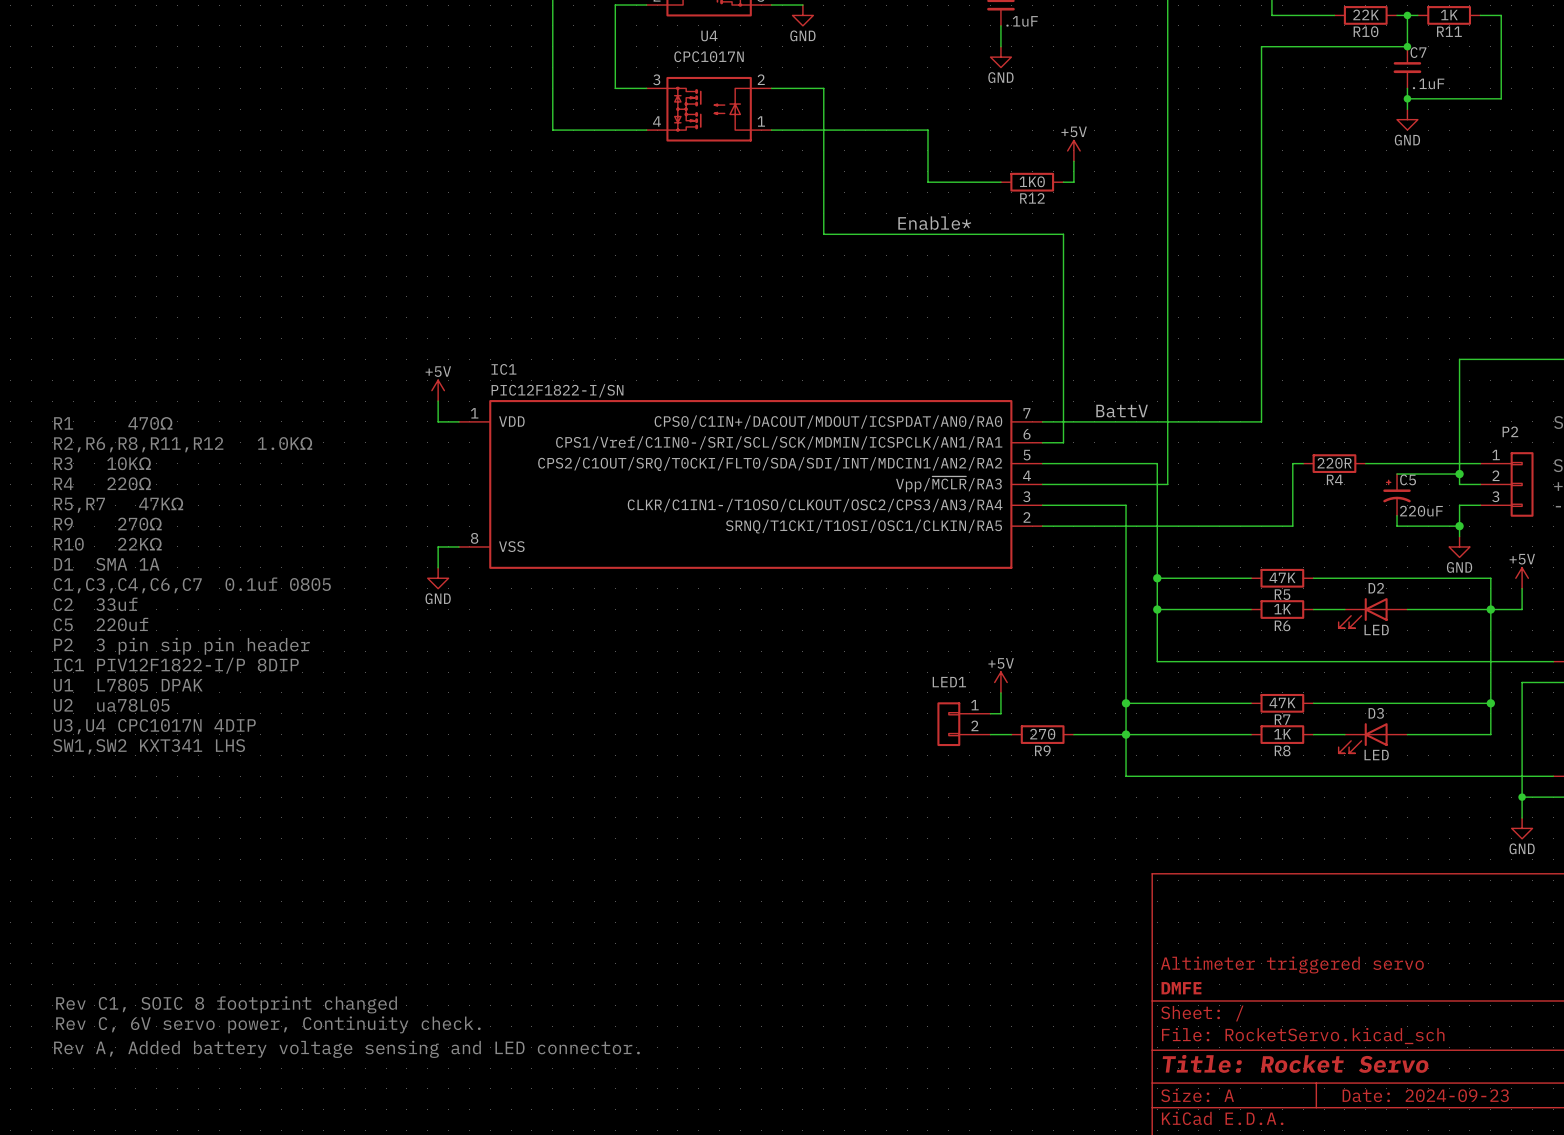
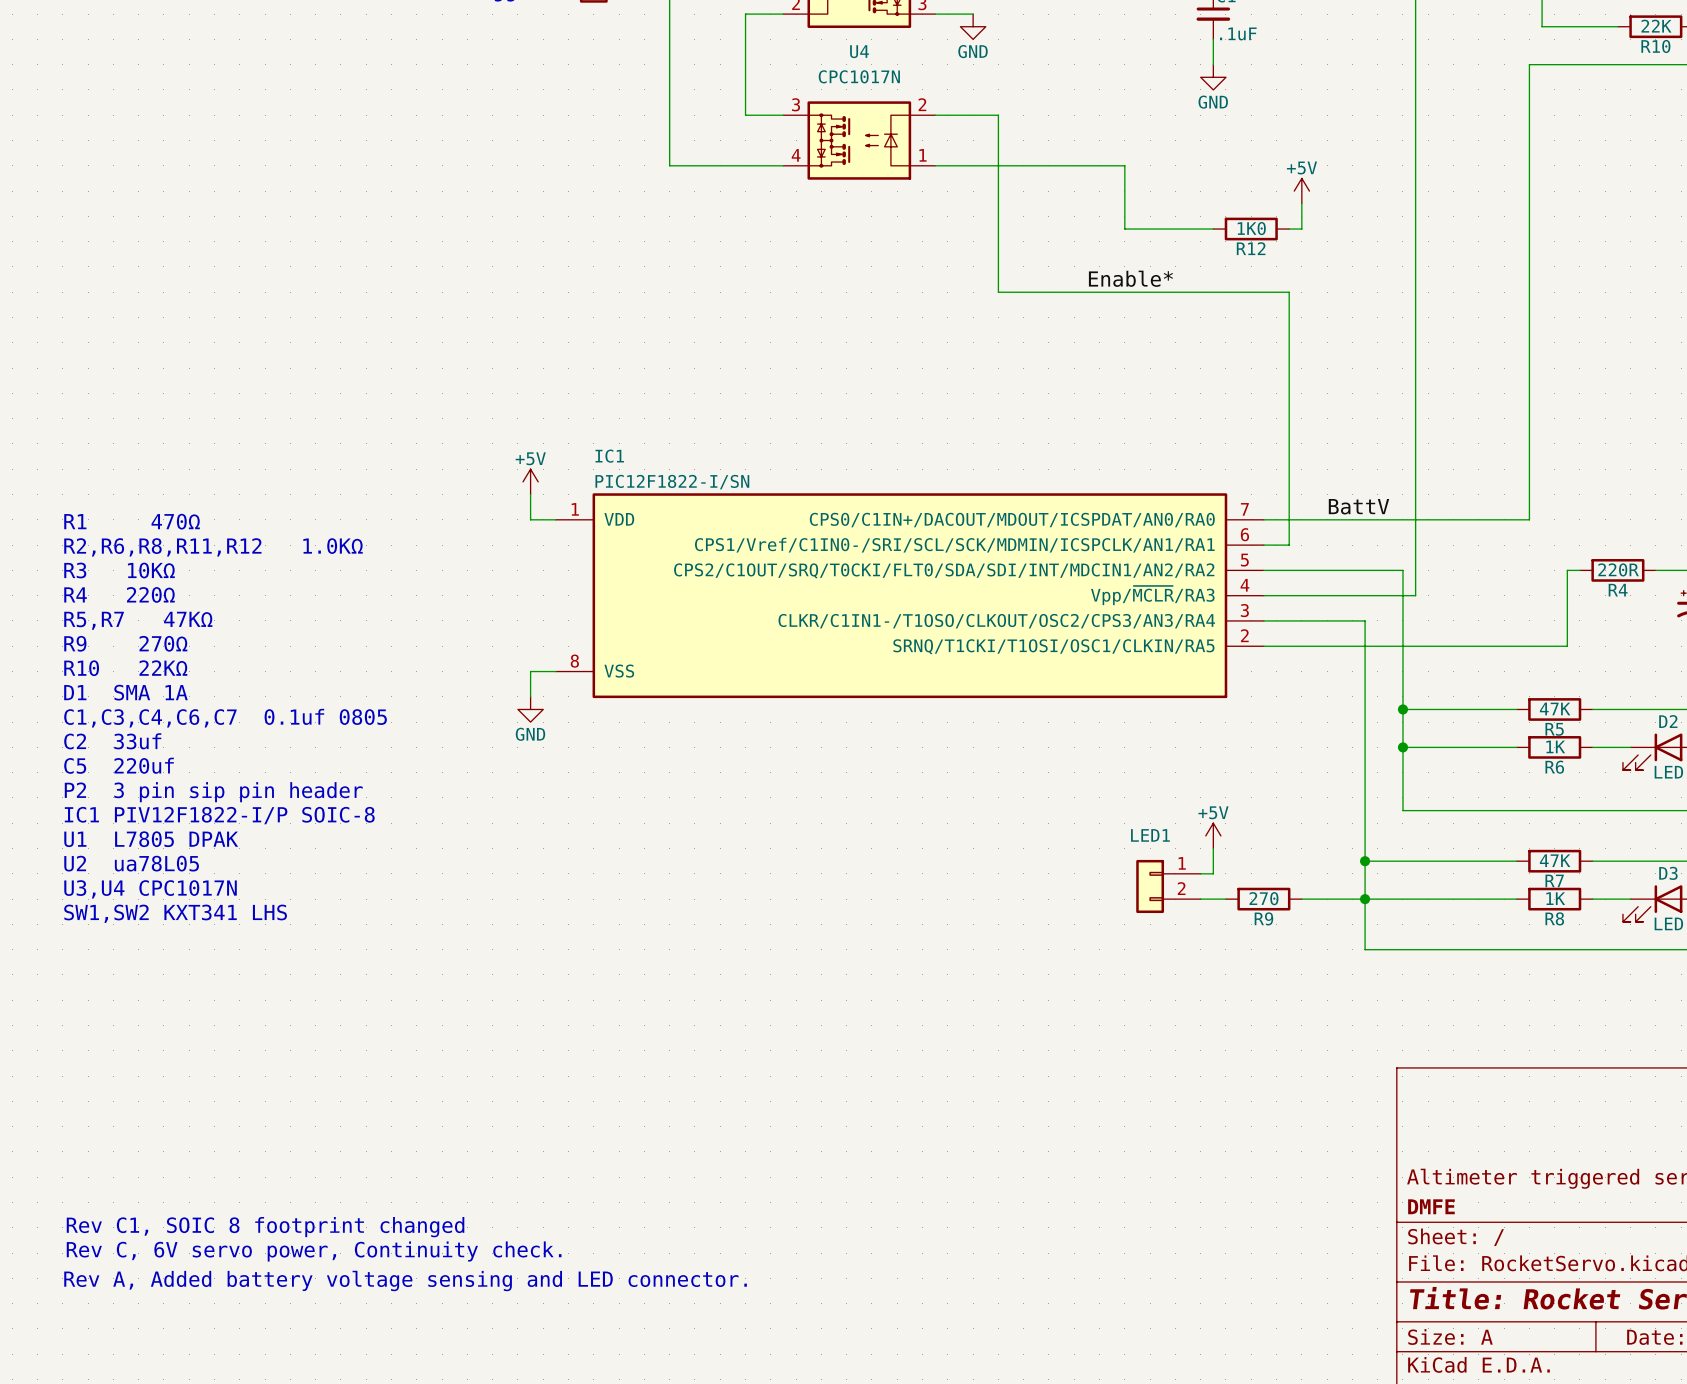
text: IC1 PIV12F1822-I/P 8DIP (176, 665) -> IC1 PIV12F1822-I/P SOIC-8 (219, 815)
text: U3,U4 CPC1017N 4DIP (154, 726) -> U3,U4 CPC1017N (150, 889)

